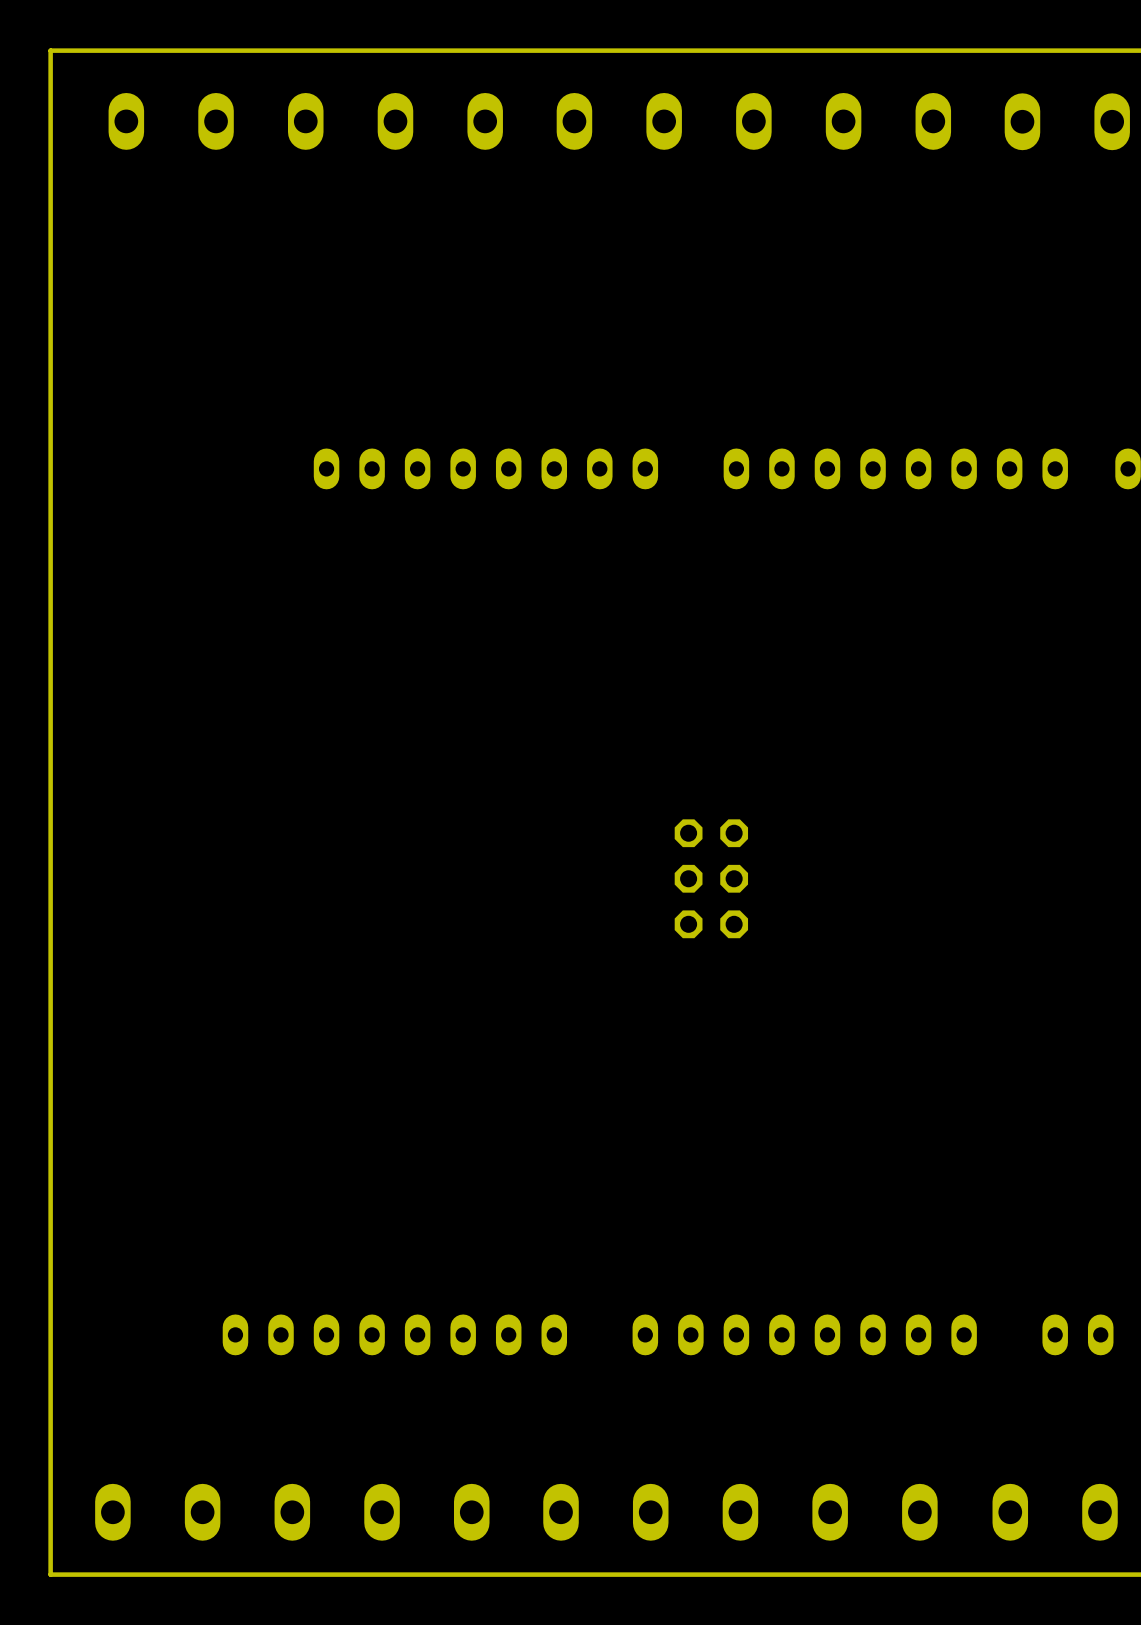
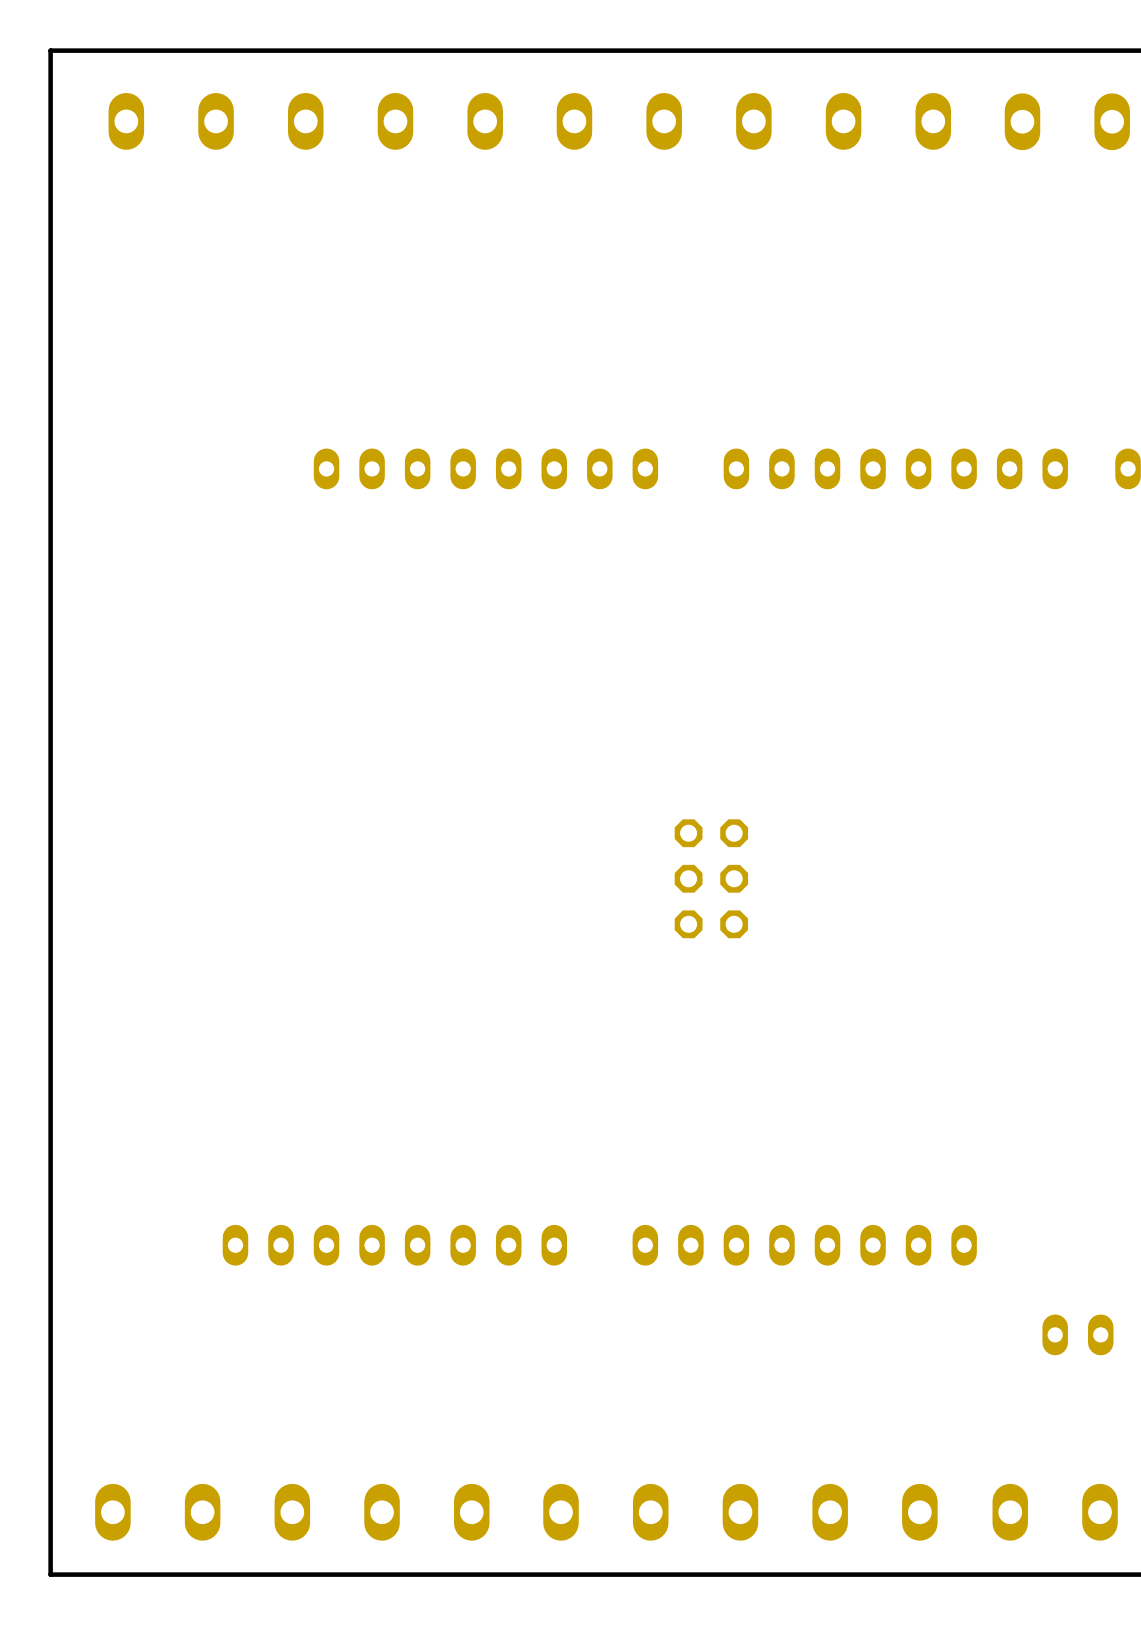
part position: (394, 1334) -> (394, 1245)
part position: (804, 1334) -> (804, 1245)

